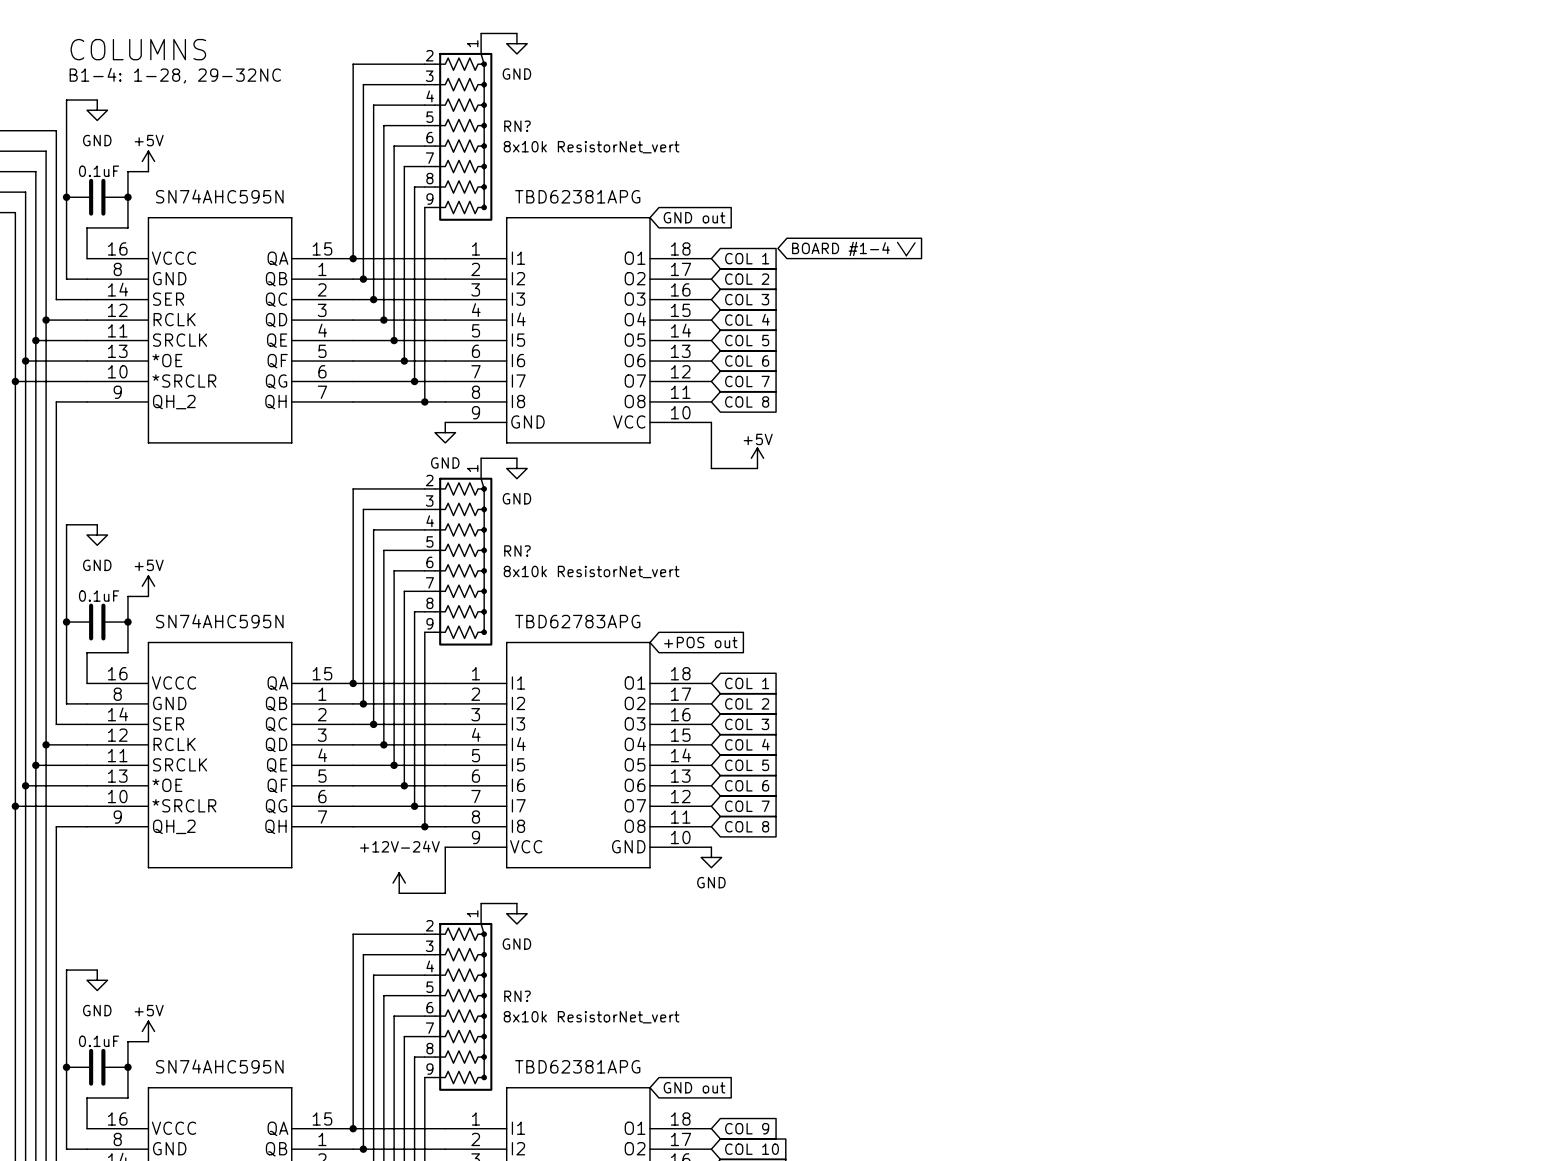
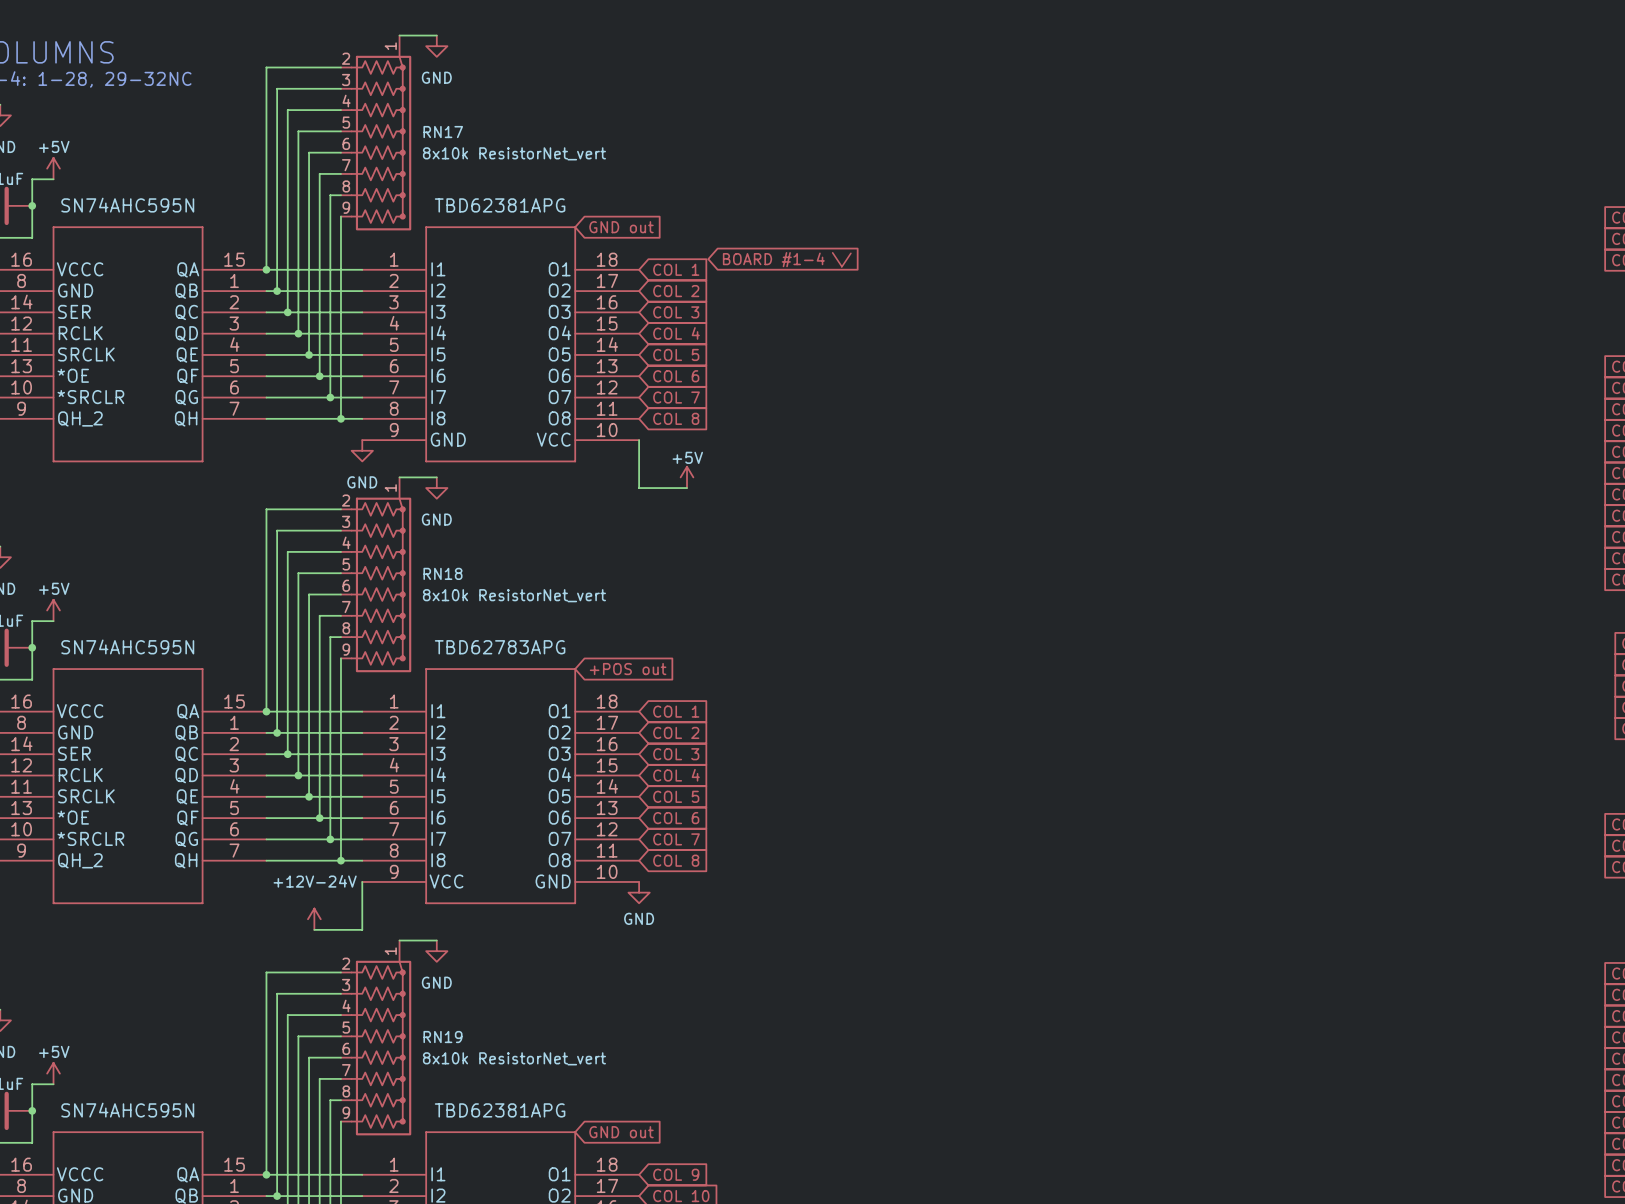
RN? name: RN? (517, 126) -> RN17 (443, 132)
RN? name: RN? (517, 551) -> RN18 (442, 573)
RN? name: RN? (517, 996) -> RN19 (442, 1037)

